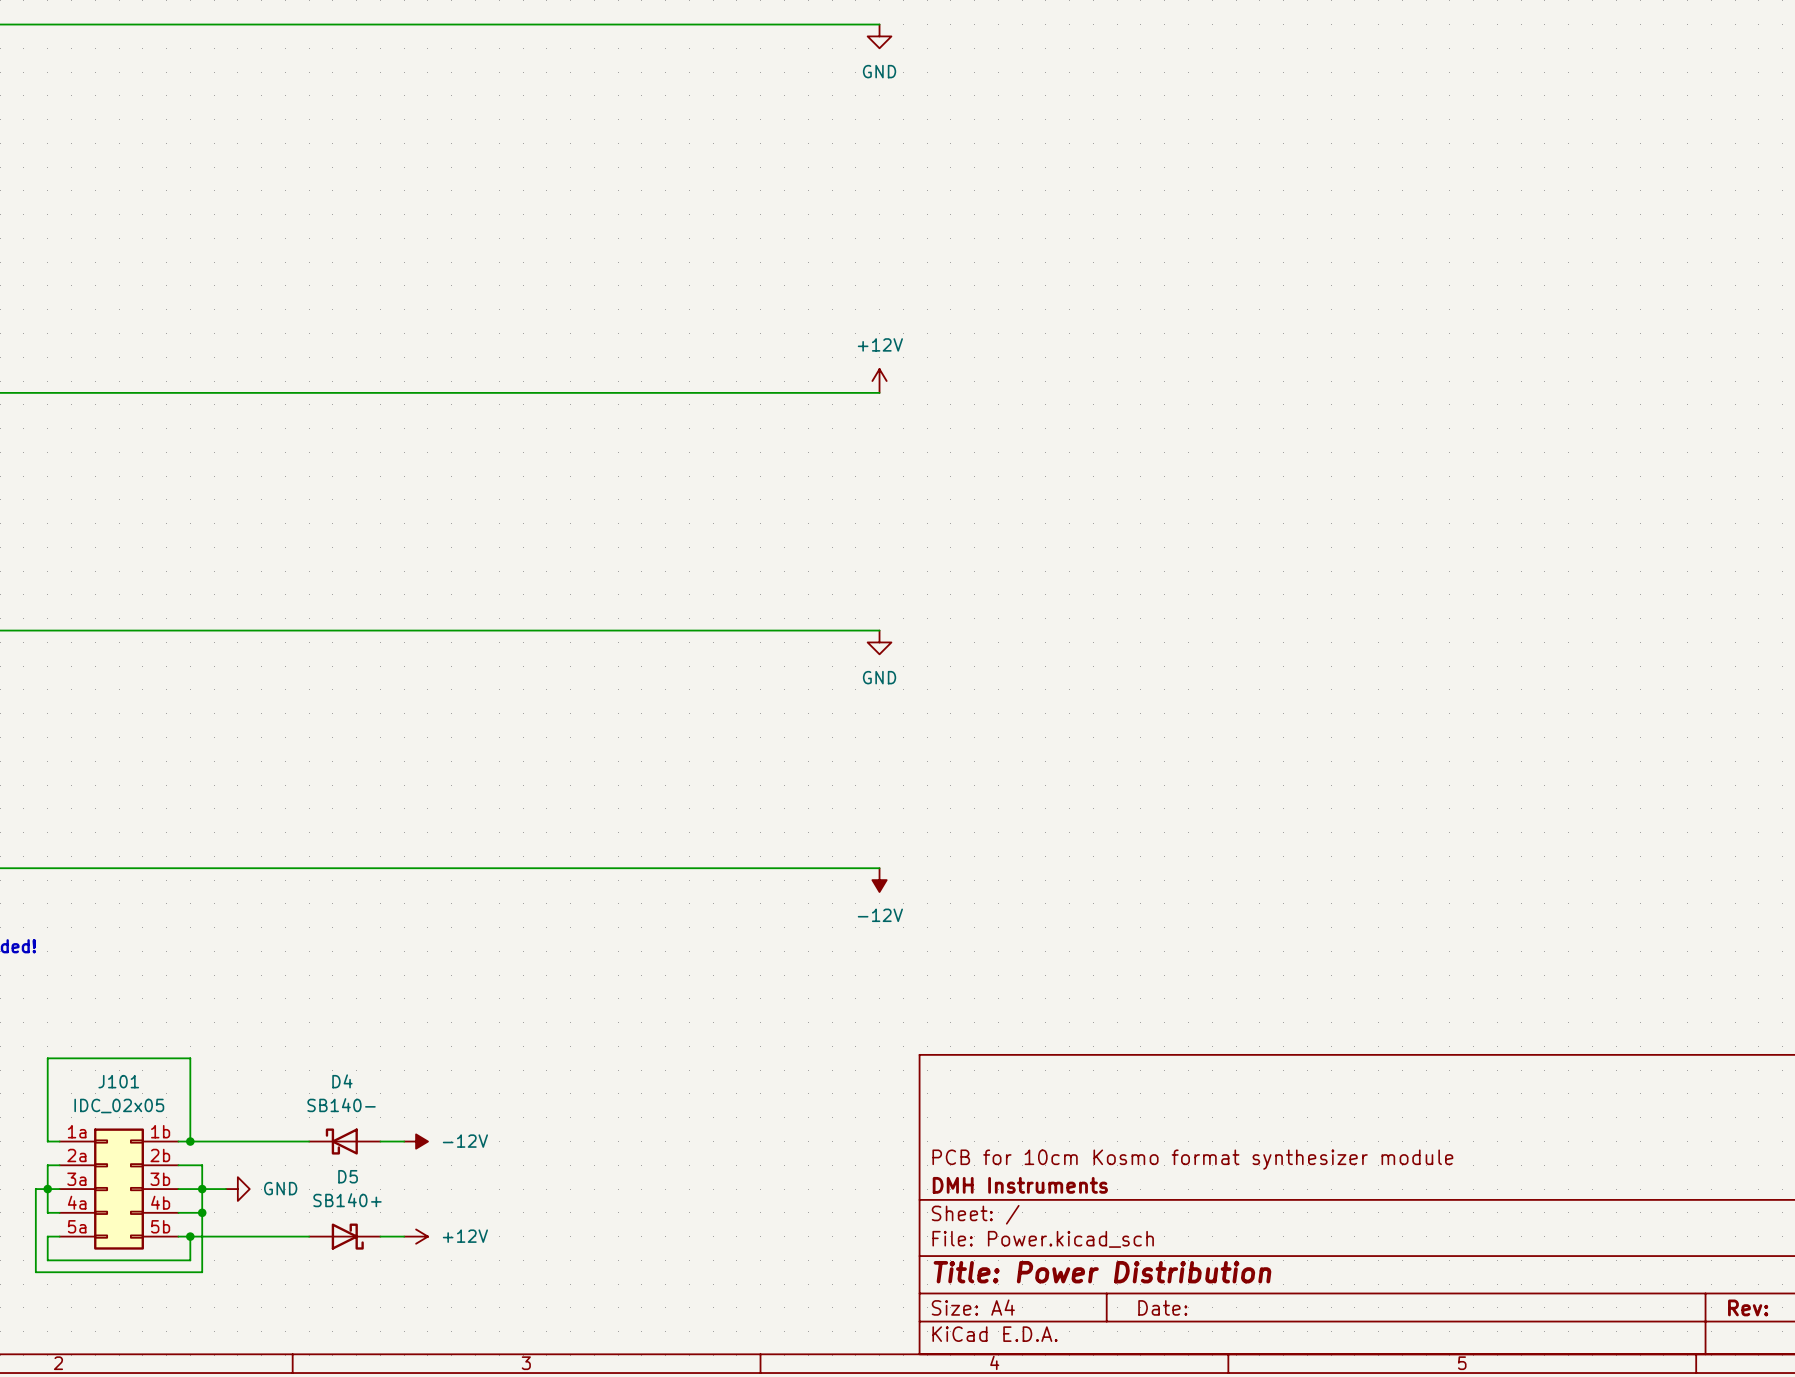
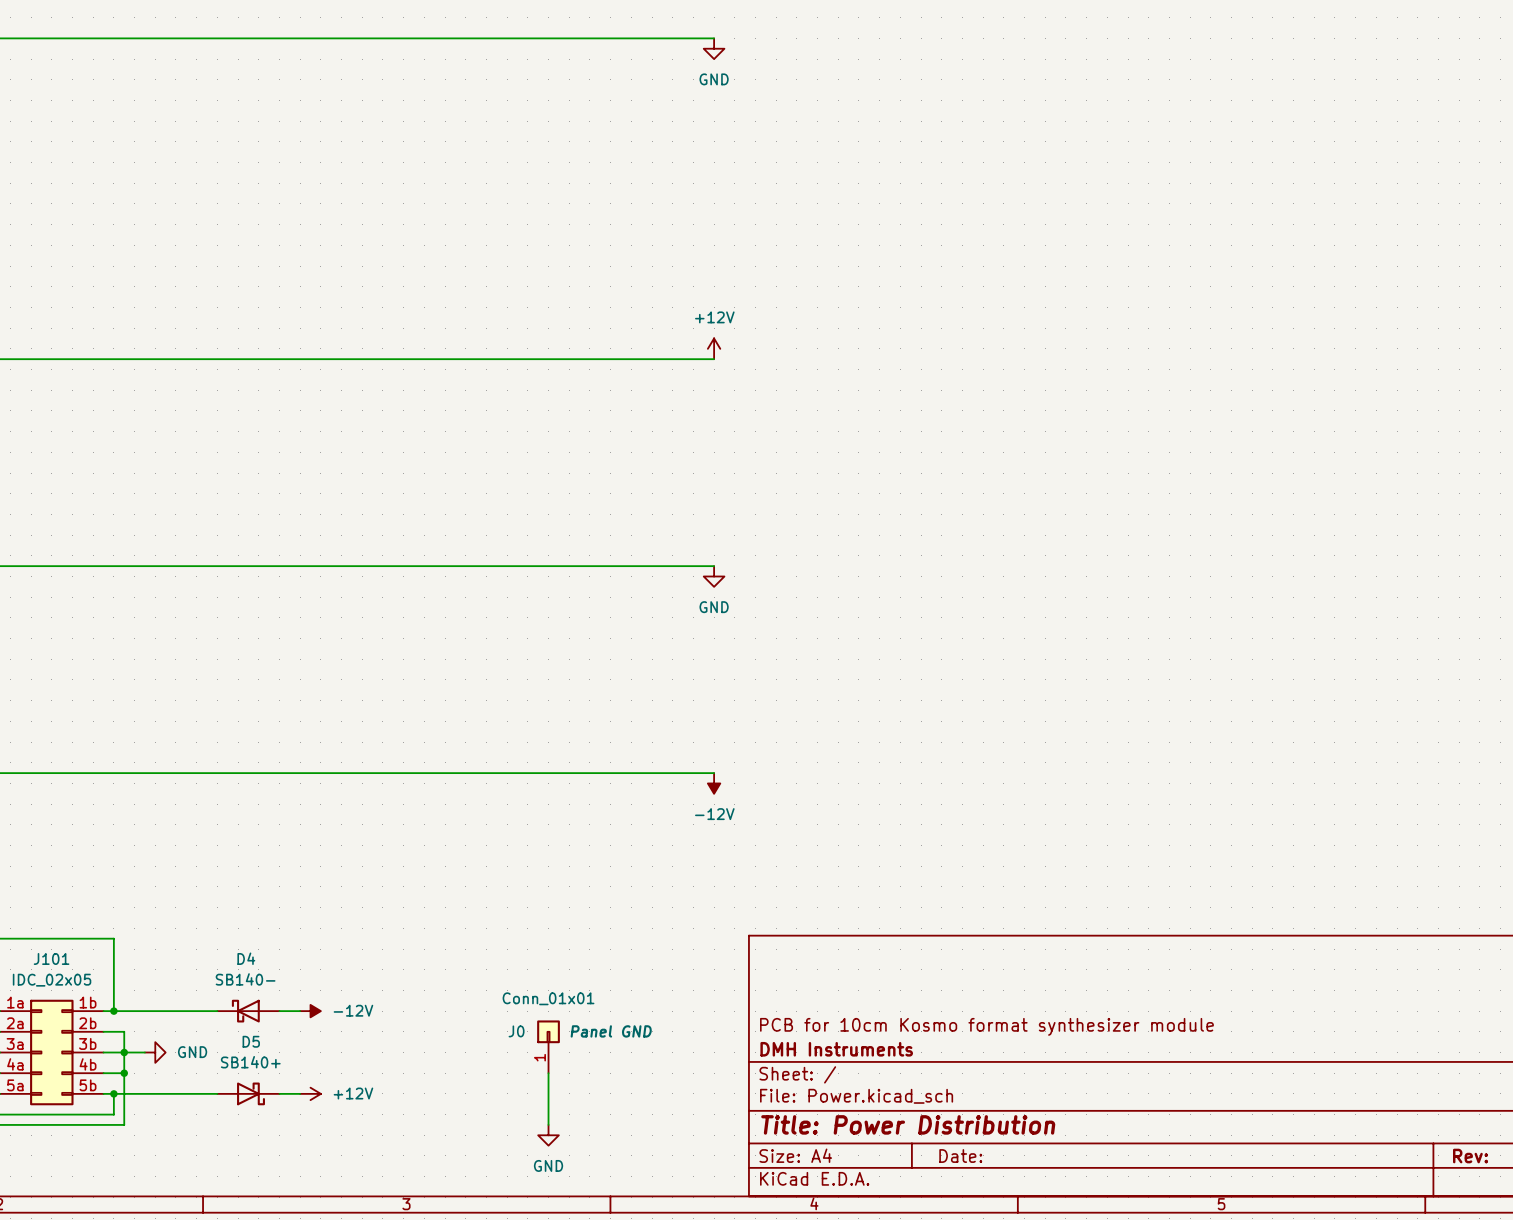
J0: none -> Conn_01x01 (548, 1046)
wire: none -> (548, 1073) (548, 1124)
power symbol: none -> GND (548, 1135)

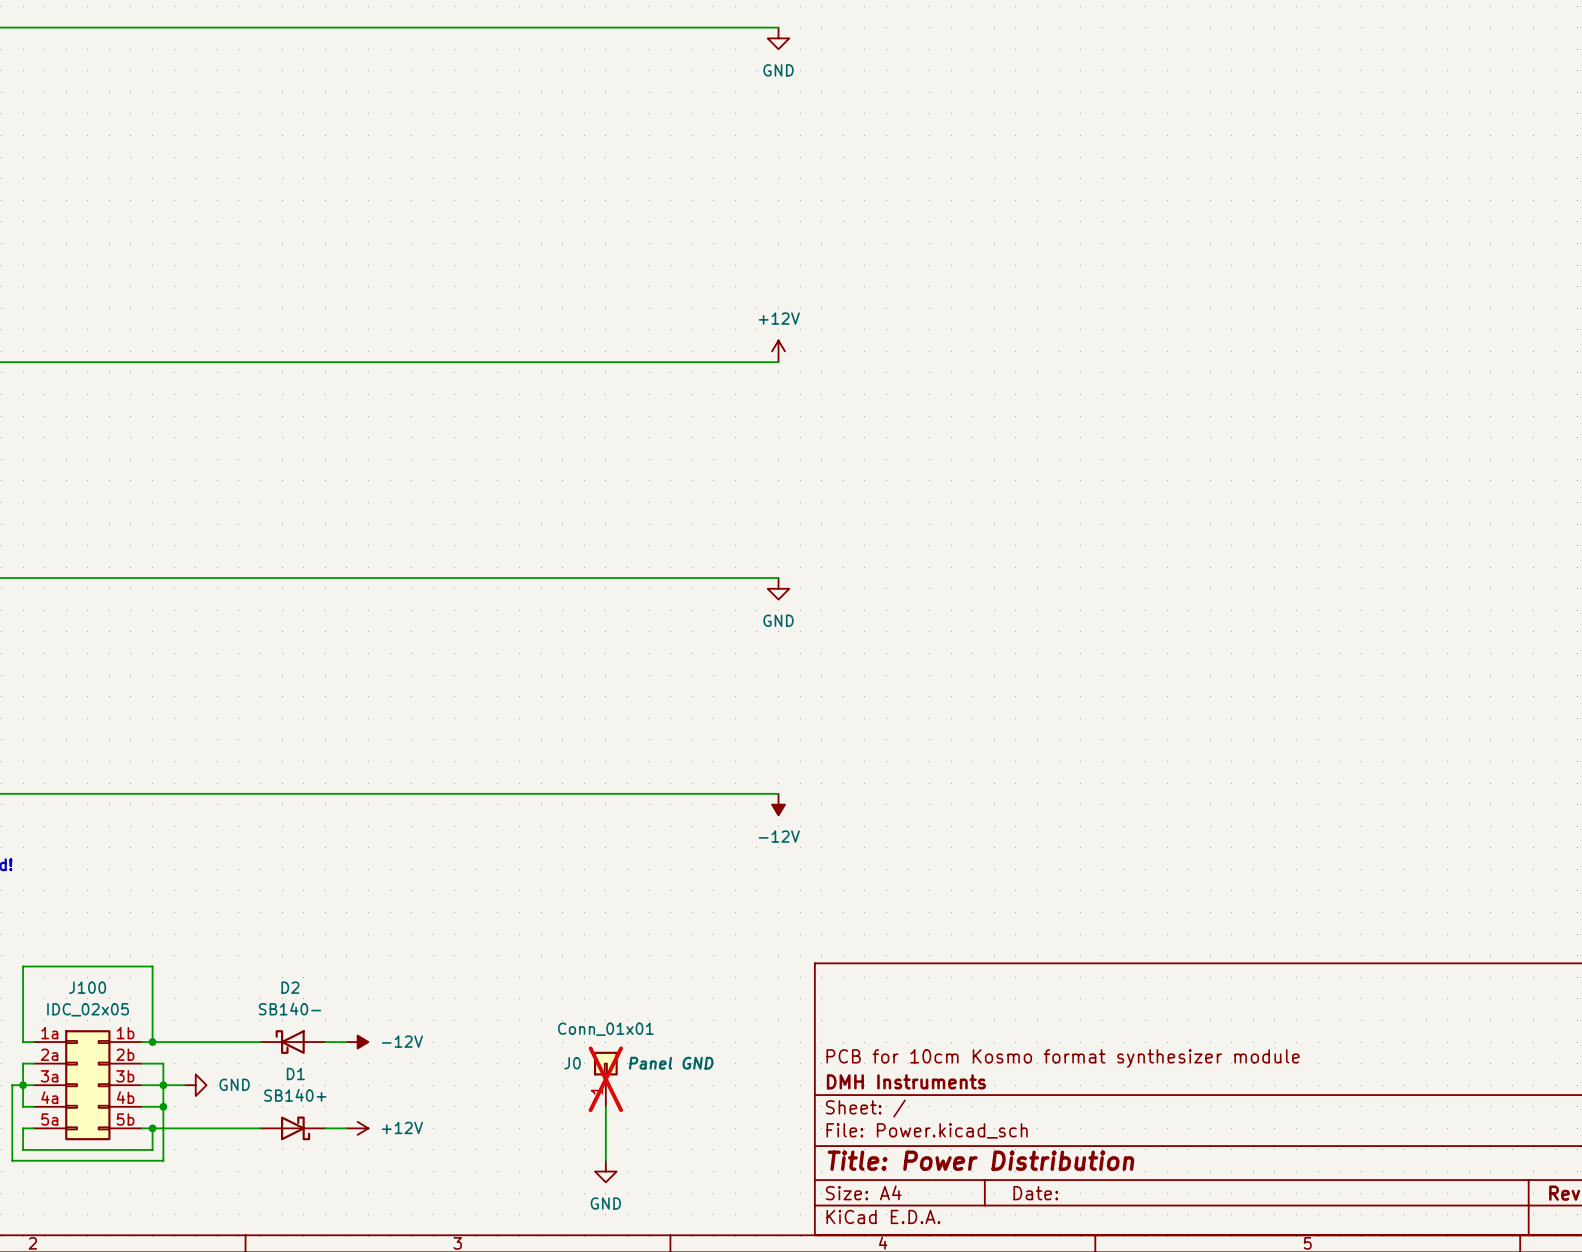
J101 name: J101 (51, 958) -> J100 (87, 987)
D4 name: D4 (246, 958) -> D2 (290, 987)
D5 name: D5 (251, 1041) -> D1 (295, 1074)
J0 do-not-place cross: none -> (605, 1079)

